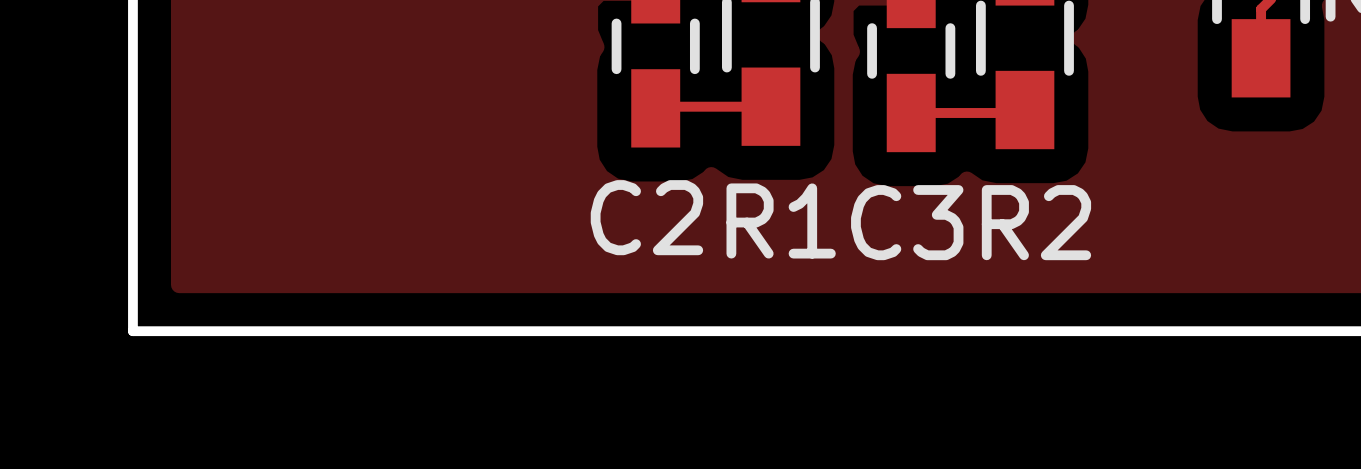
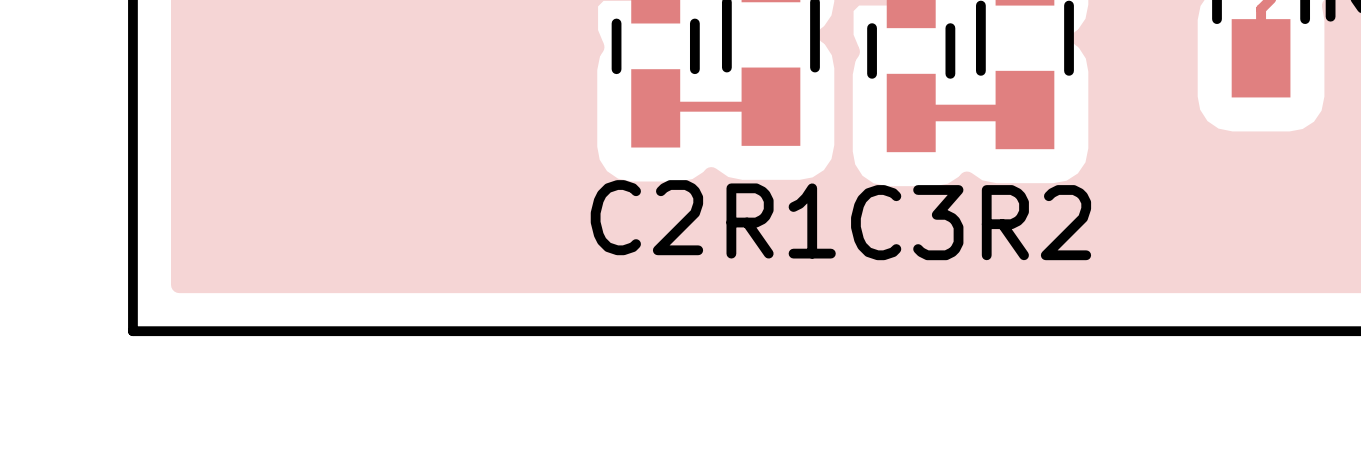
track width: thin (1024, 110) (1021, 112) (911, 112) -> thick (1024, 110) (1021, 112) (911, 112)

